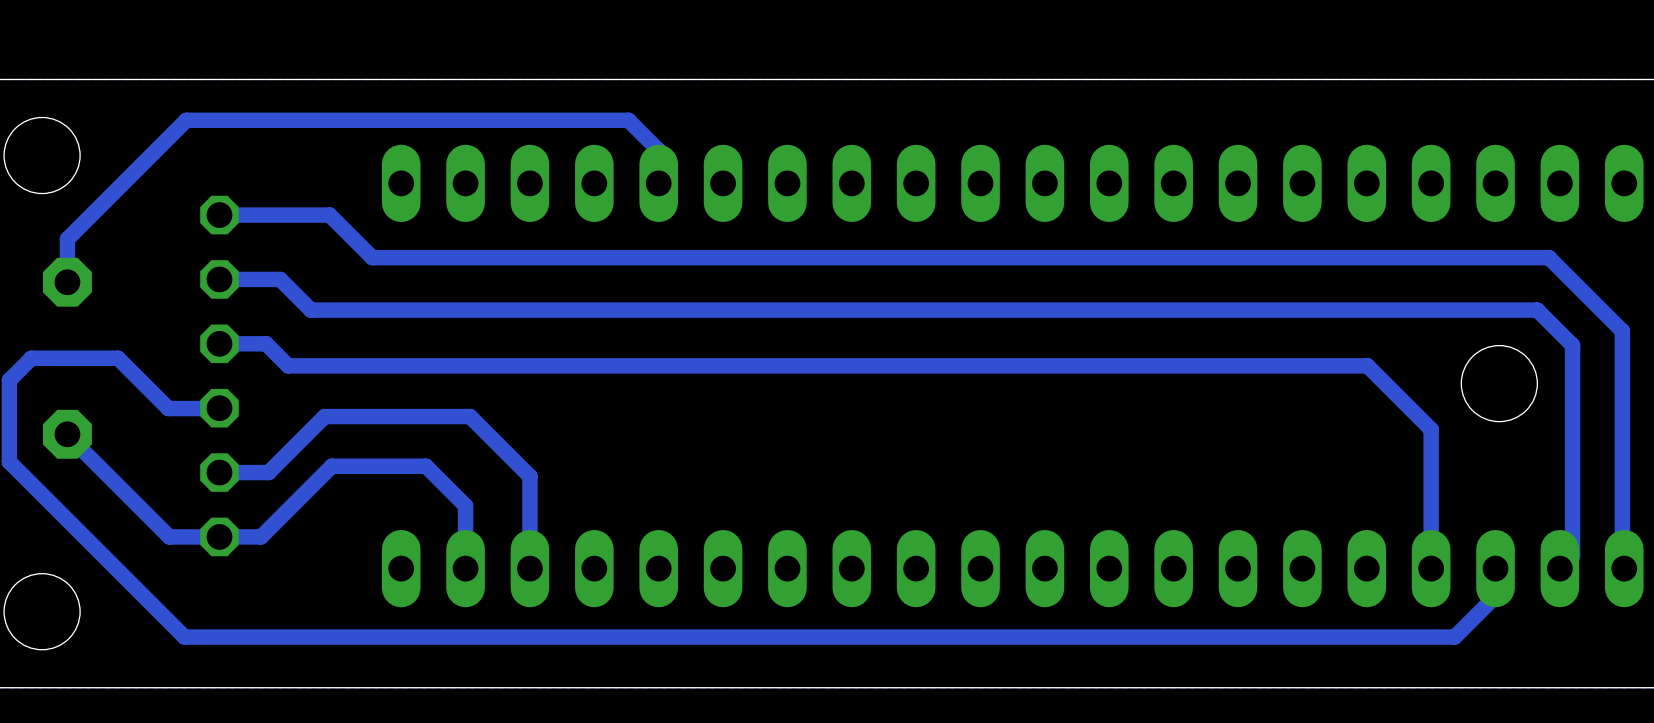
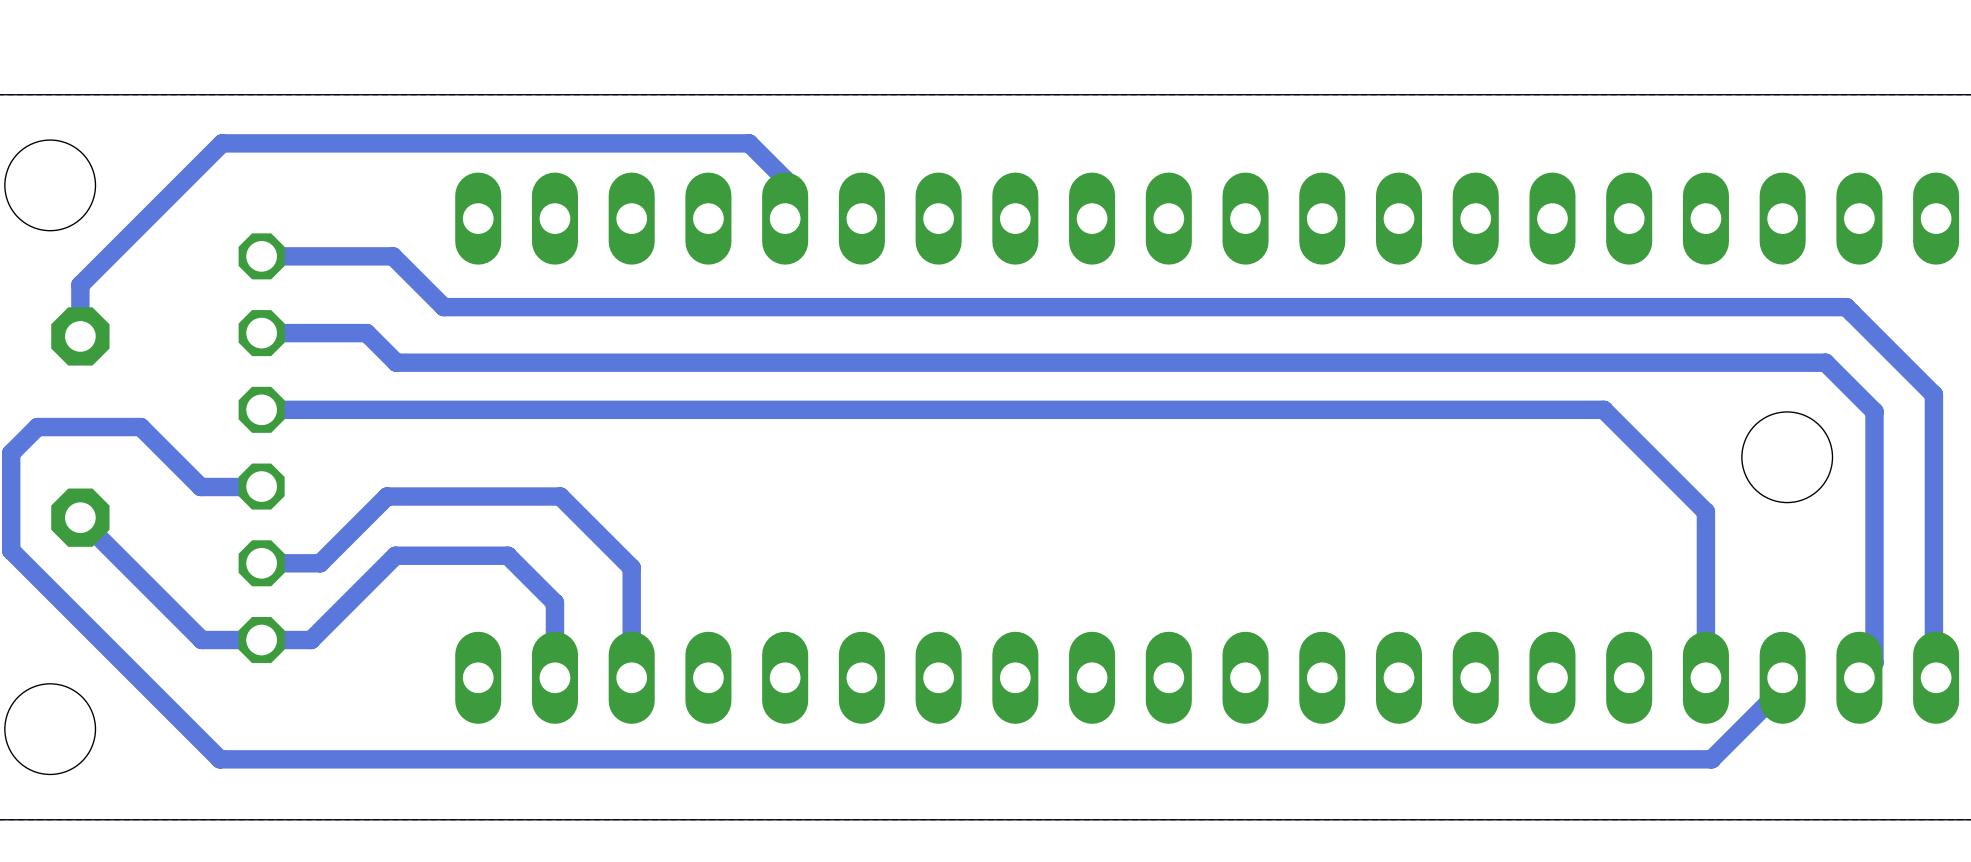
track: (280, 279) (310, 310) (1537, 310) -> (334, 333) (366, 333) (396, 362) (1825, 362) (1832, 369)
track: (266, 343) (288, 365) (1367, 365) -> (317, 409) (1603, 409) (1630, 436)
track: (1495, 577) (1495, 596) (1454, 637) (1435, 637) -> (1782, 688) (1711, 759)

